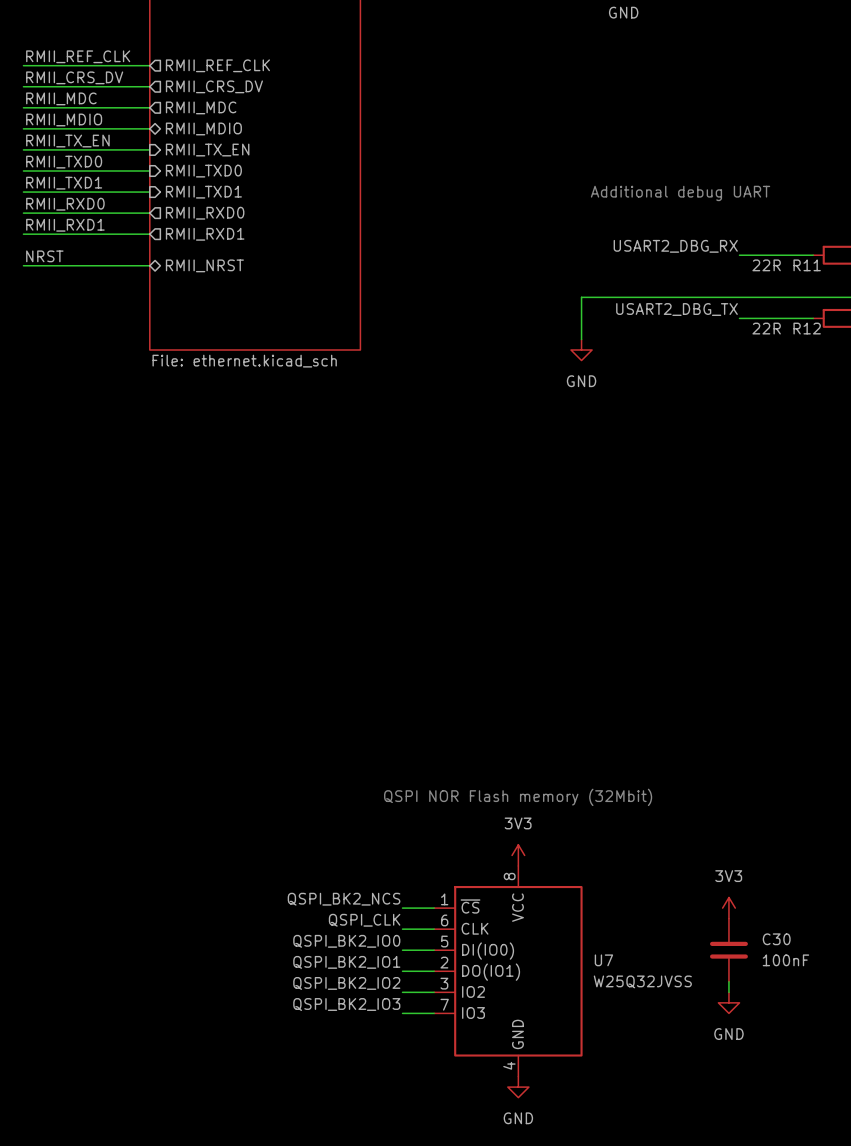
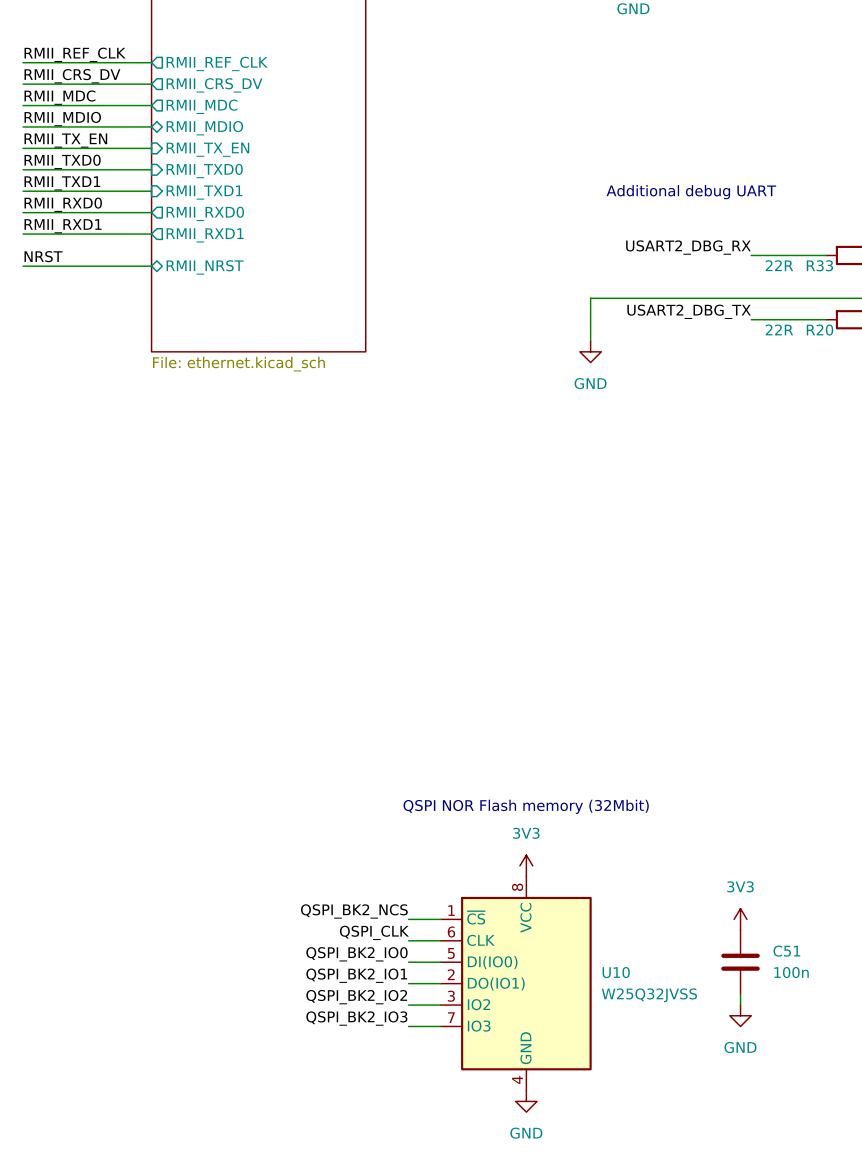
R11 name: R11 (807, 265) -> R33 (819, 265)
R12 name: R12 (807, 328) -> R20 (820, 330)
C30 name: C30 (776, 939) -> C51 (786, 951)
U7 name: U7 (603, 960) -> U10 (616, 972)
C30 value: 100nF (785, 960) -> 100n (791, 972)

